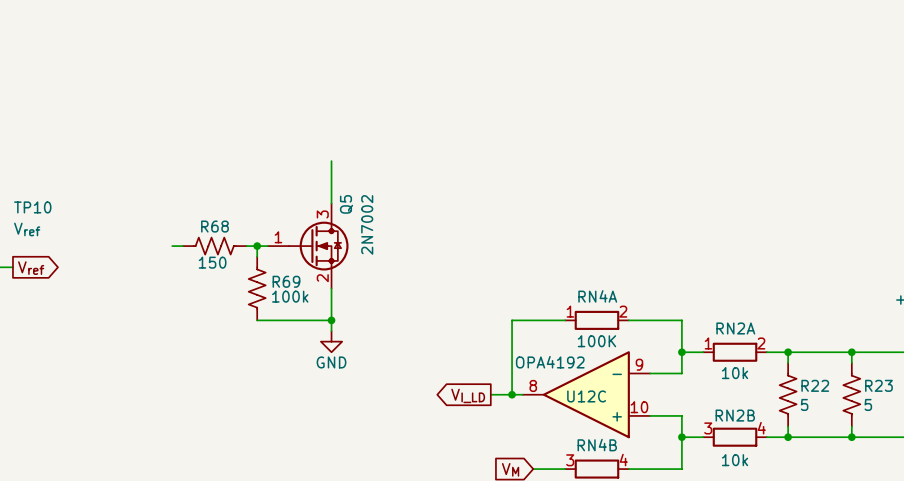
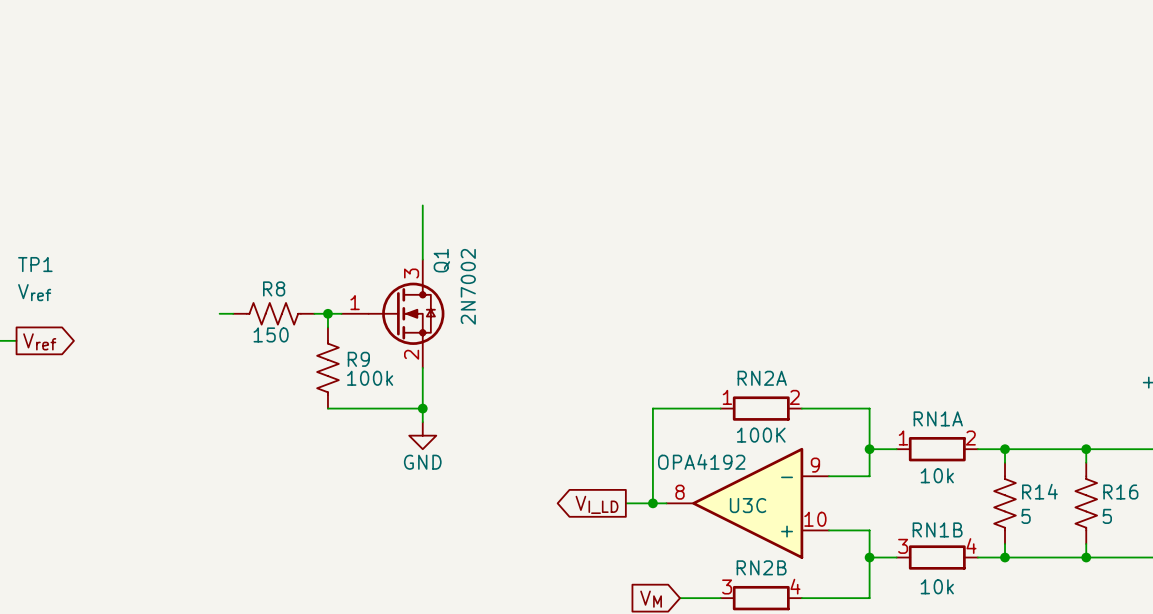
Q5 name: Q5 (346, 204) -> Q1 (441, 260)
TP10 name: TP10 (32, 207) -> TP1 (35, 264)
R68 name: R68 (214, 226) -> R8 (274, 288)
R69 name: R69 (286, 281) -> R9 (358, 359)
RN4A name: RN4A (597, 296) -> RN2A (762, 378)
RN2A name: RN2A (735, 328) -> RN1A (938, 418)
R22 name: R22 (815, 385) -> R14 (1039, 491)
R23 name: R23 (878, 385) -> R16 (1120, 492)
U12C name: U12C (586, 396) -> U3C (748, 505)
RN2B name: RN2B (735, 415) -> RN1B (937, 529)
RN4B name: RN4B (597, 445) -> RN2B (761, 567)

